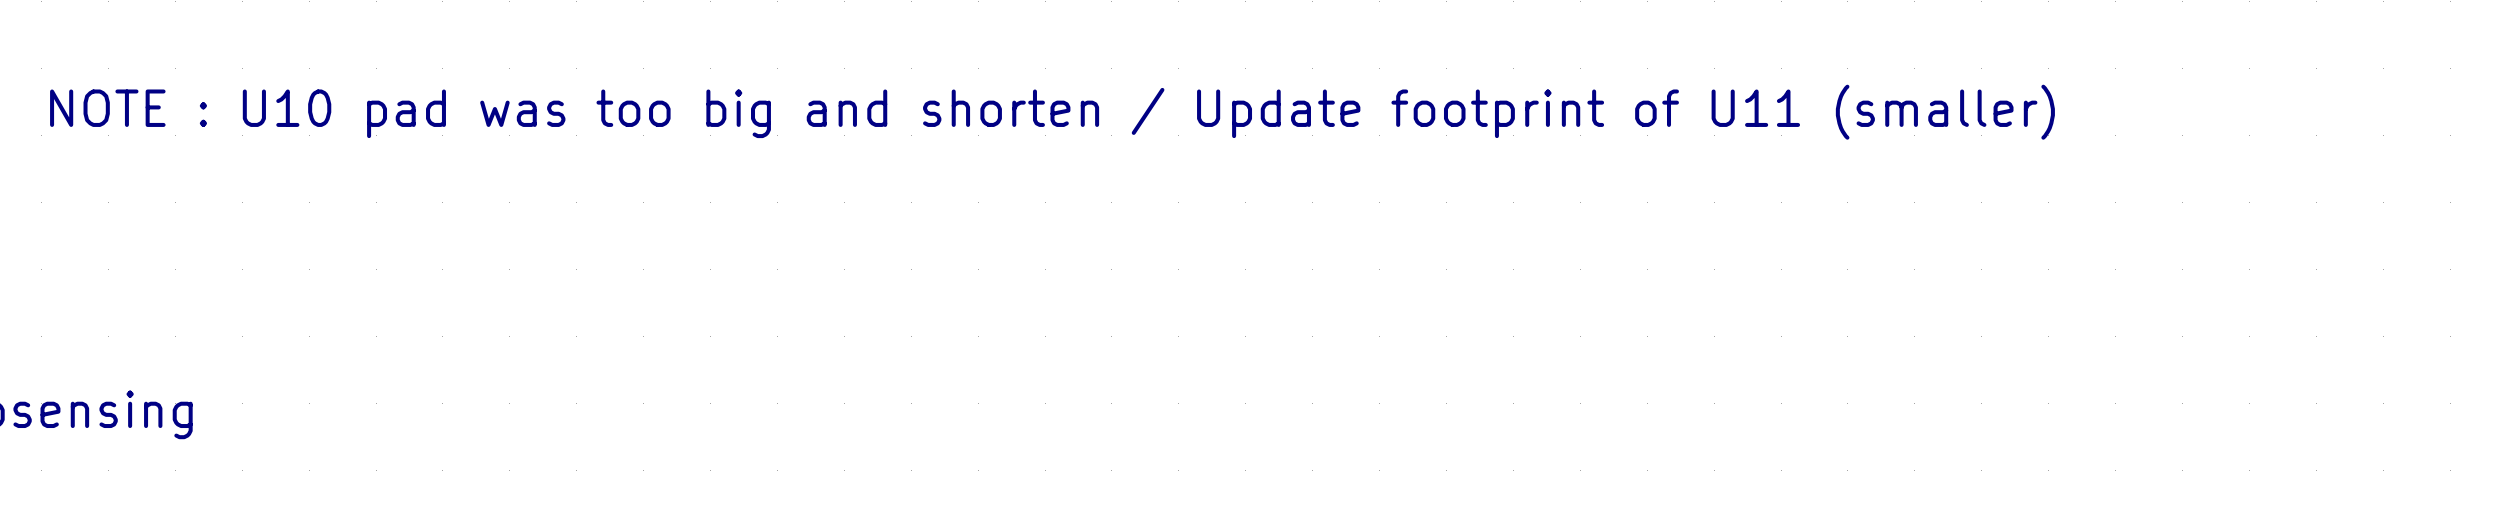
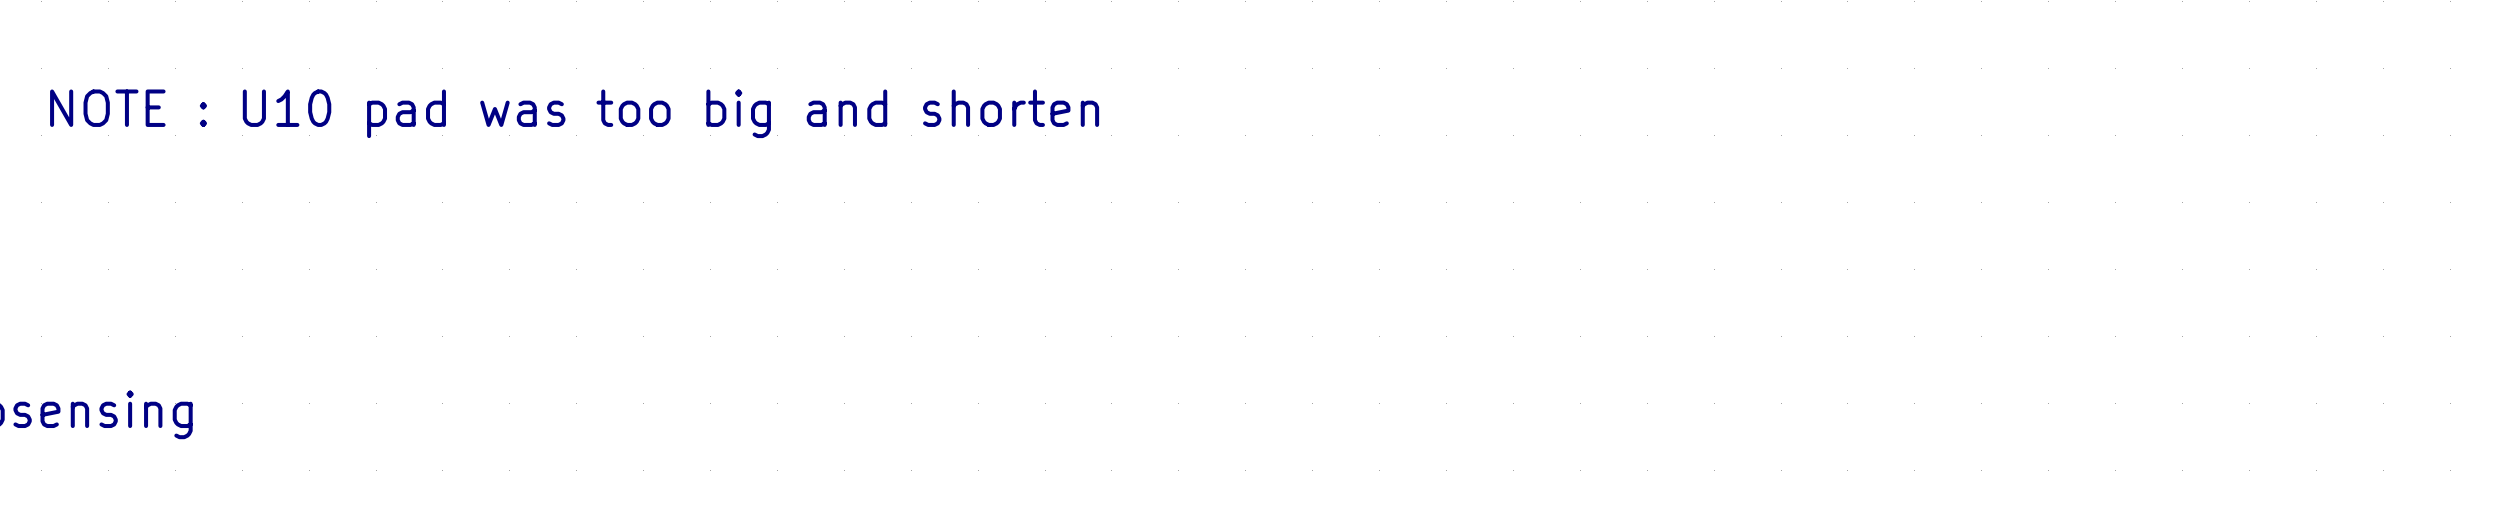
text: NOTE : U10 pad was too big and shorten / Update footprint of U11 (smaller) (1052, 112) -> NOTE : U10 pad was too big and shorten (574, 113)

